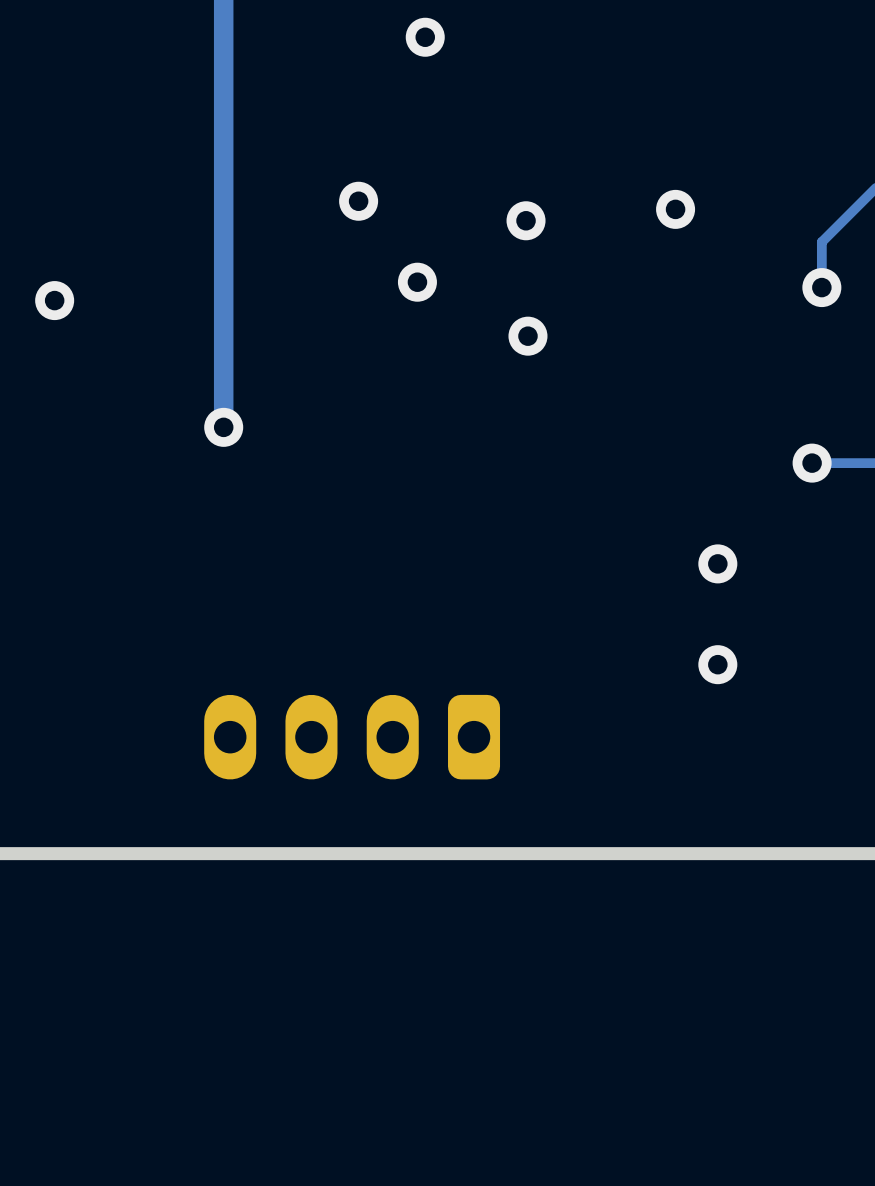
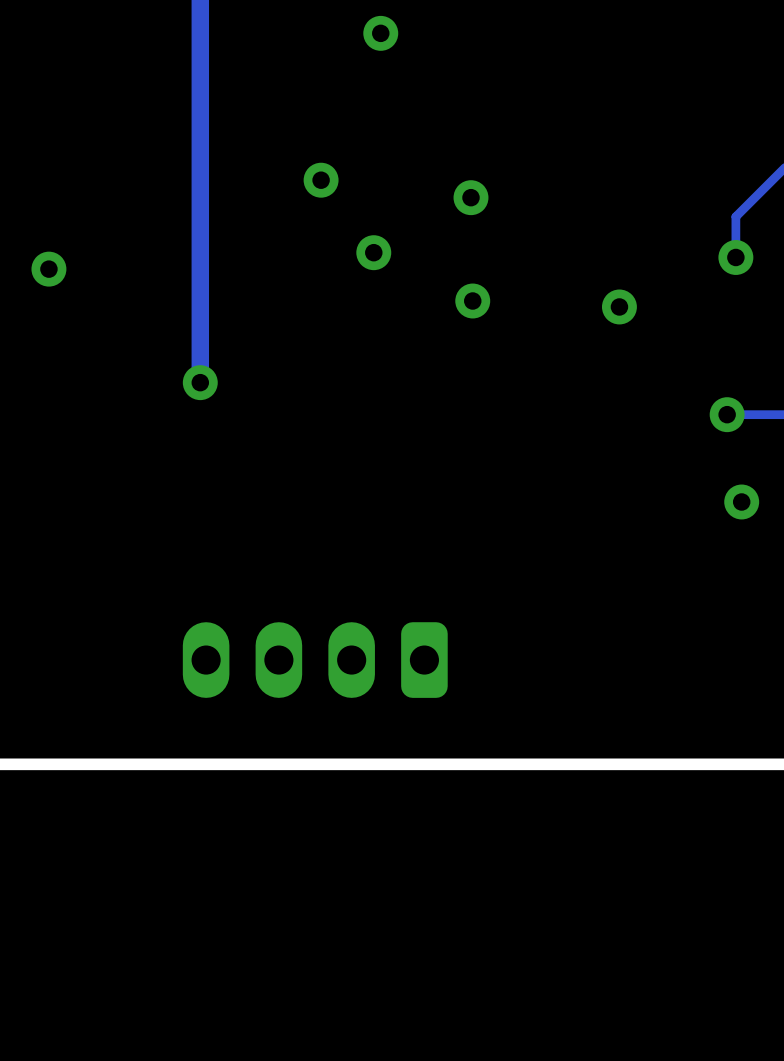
via: (675, 209) -> none
via: none -> (619, 306)
via: none -> (741, 501)
via: (717, 563) -> none
via: (717, 664) -> none

